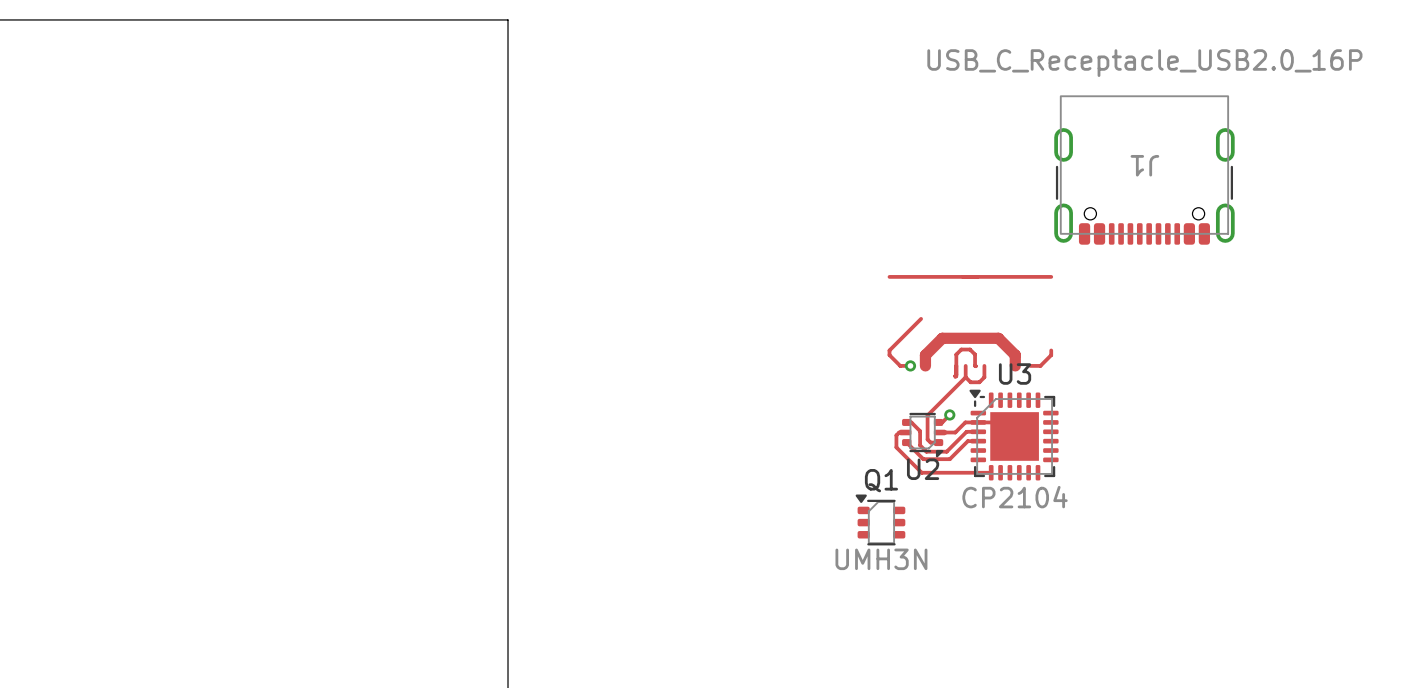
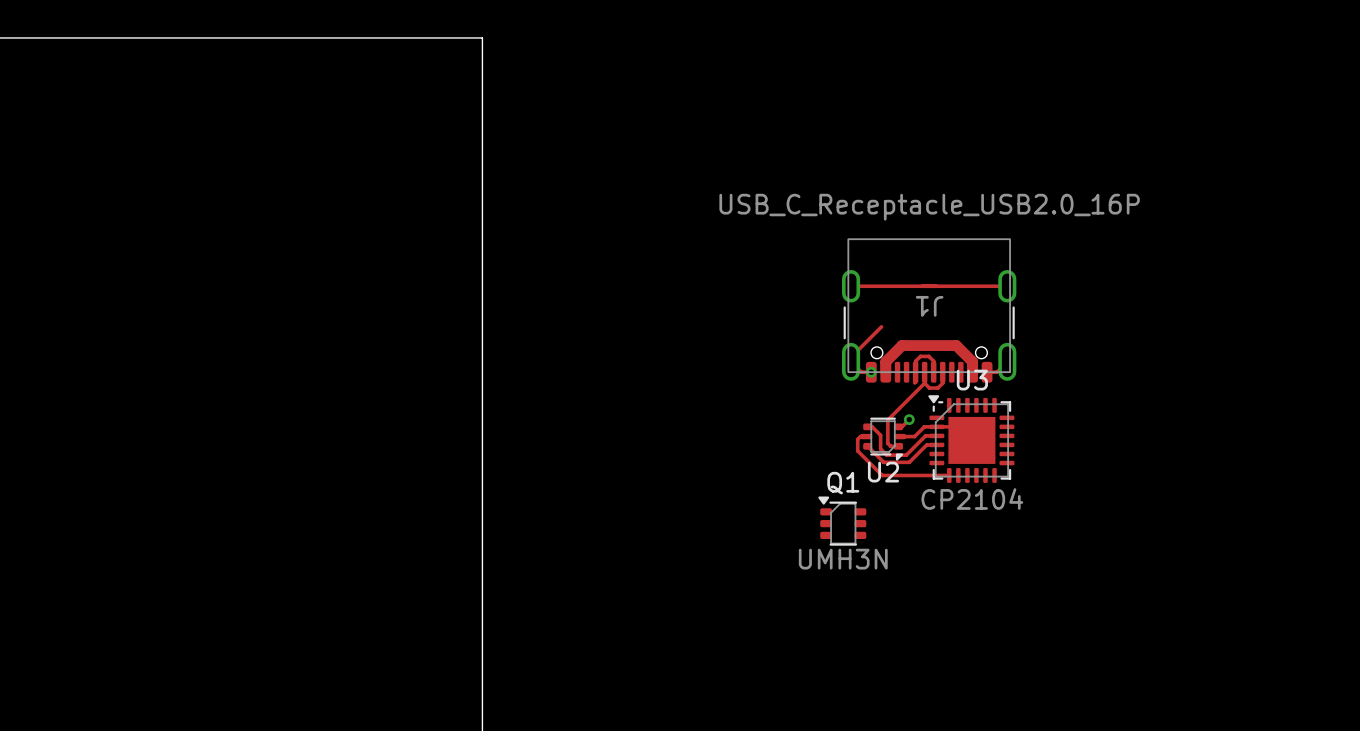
J1 position: (1144, 170) -> (929, 310)

